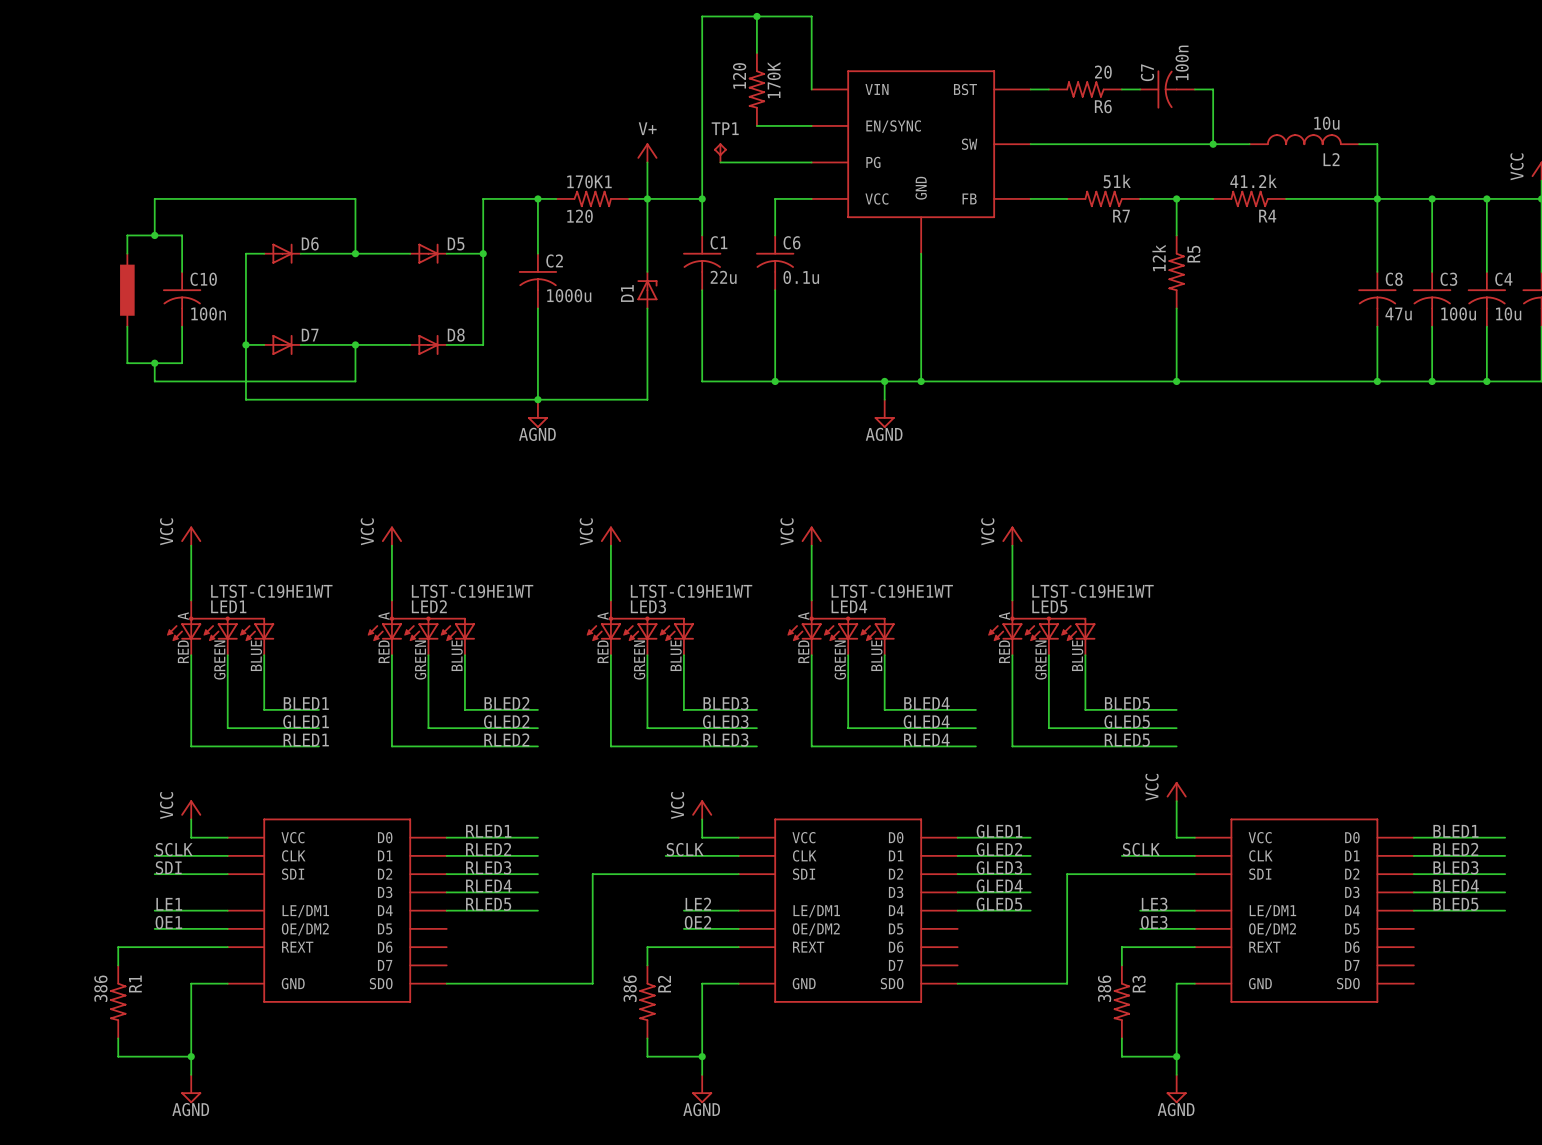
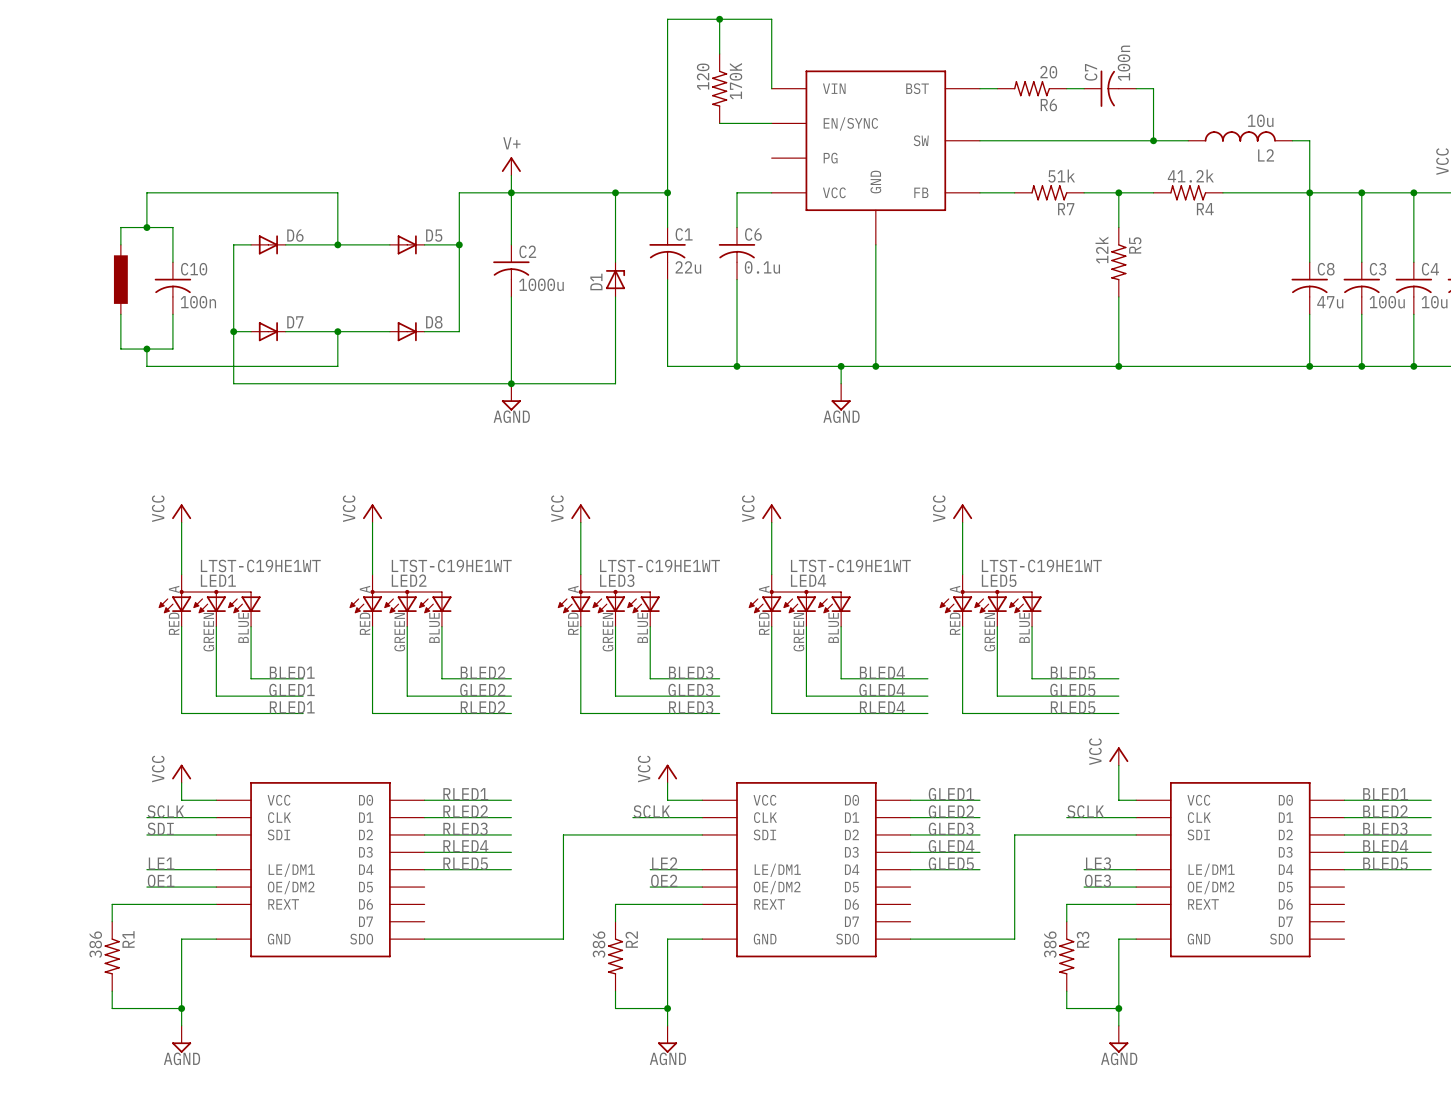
power symbol position: V+ (647, 152) -> V+ (511, 166)
TP1: (720, 152) -> none
wire: (647, 162) (647, 198) -> none
wire: (720, 162) (811, 162) -> none
wire: none -> (511, 175) (511, 192)
170K1: 120 (592, 198) -> none

